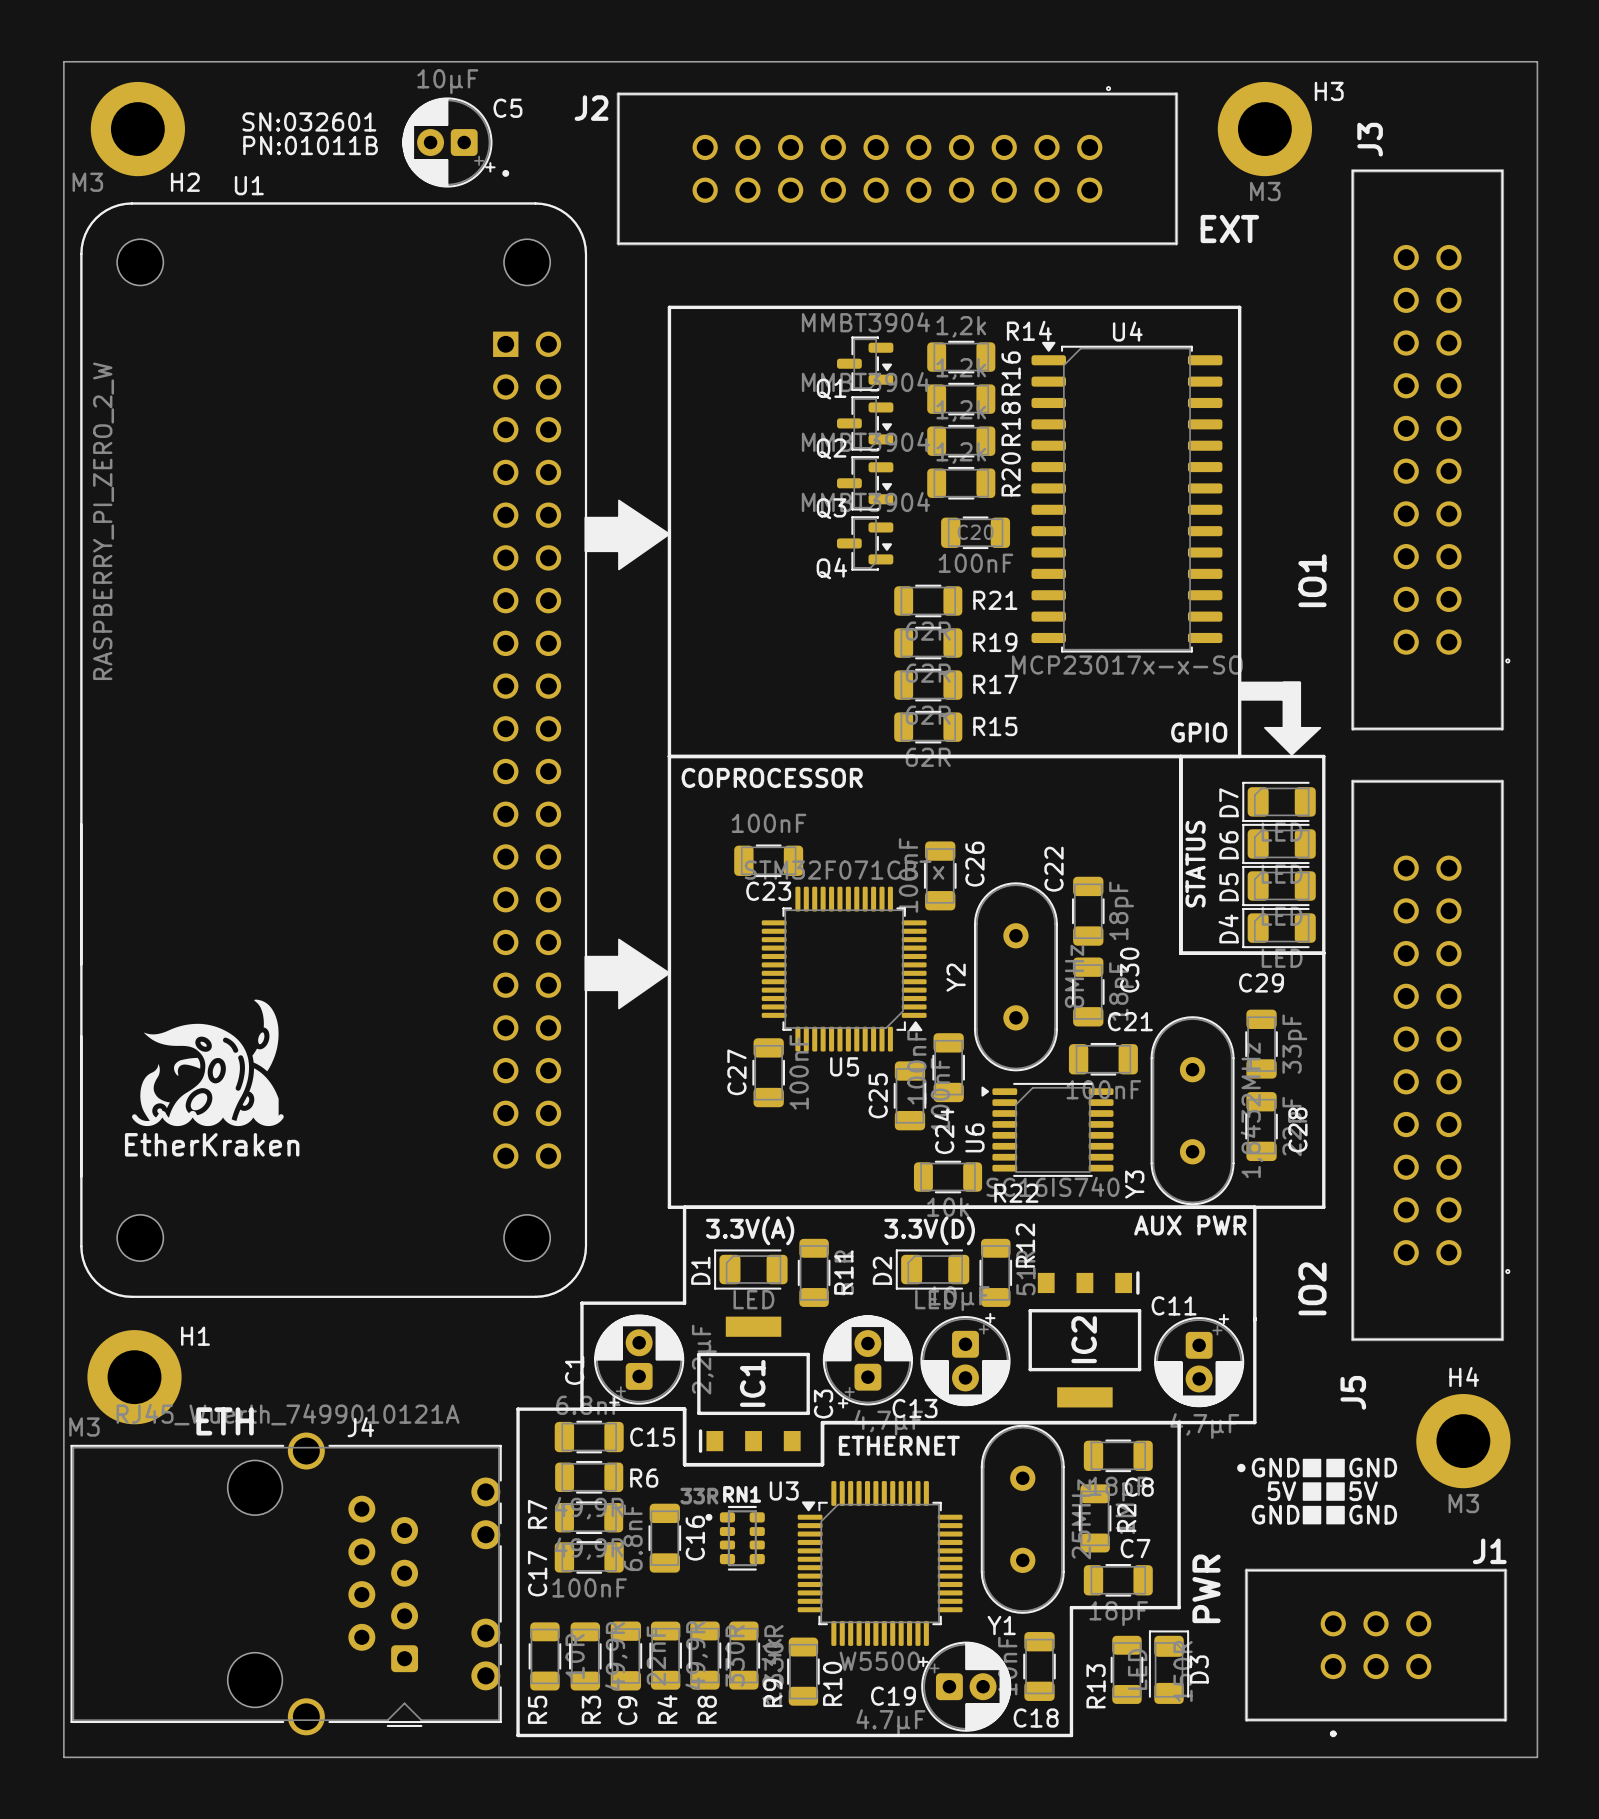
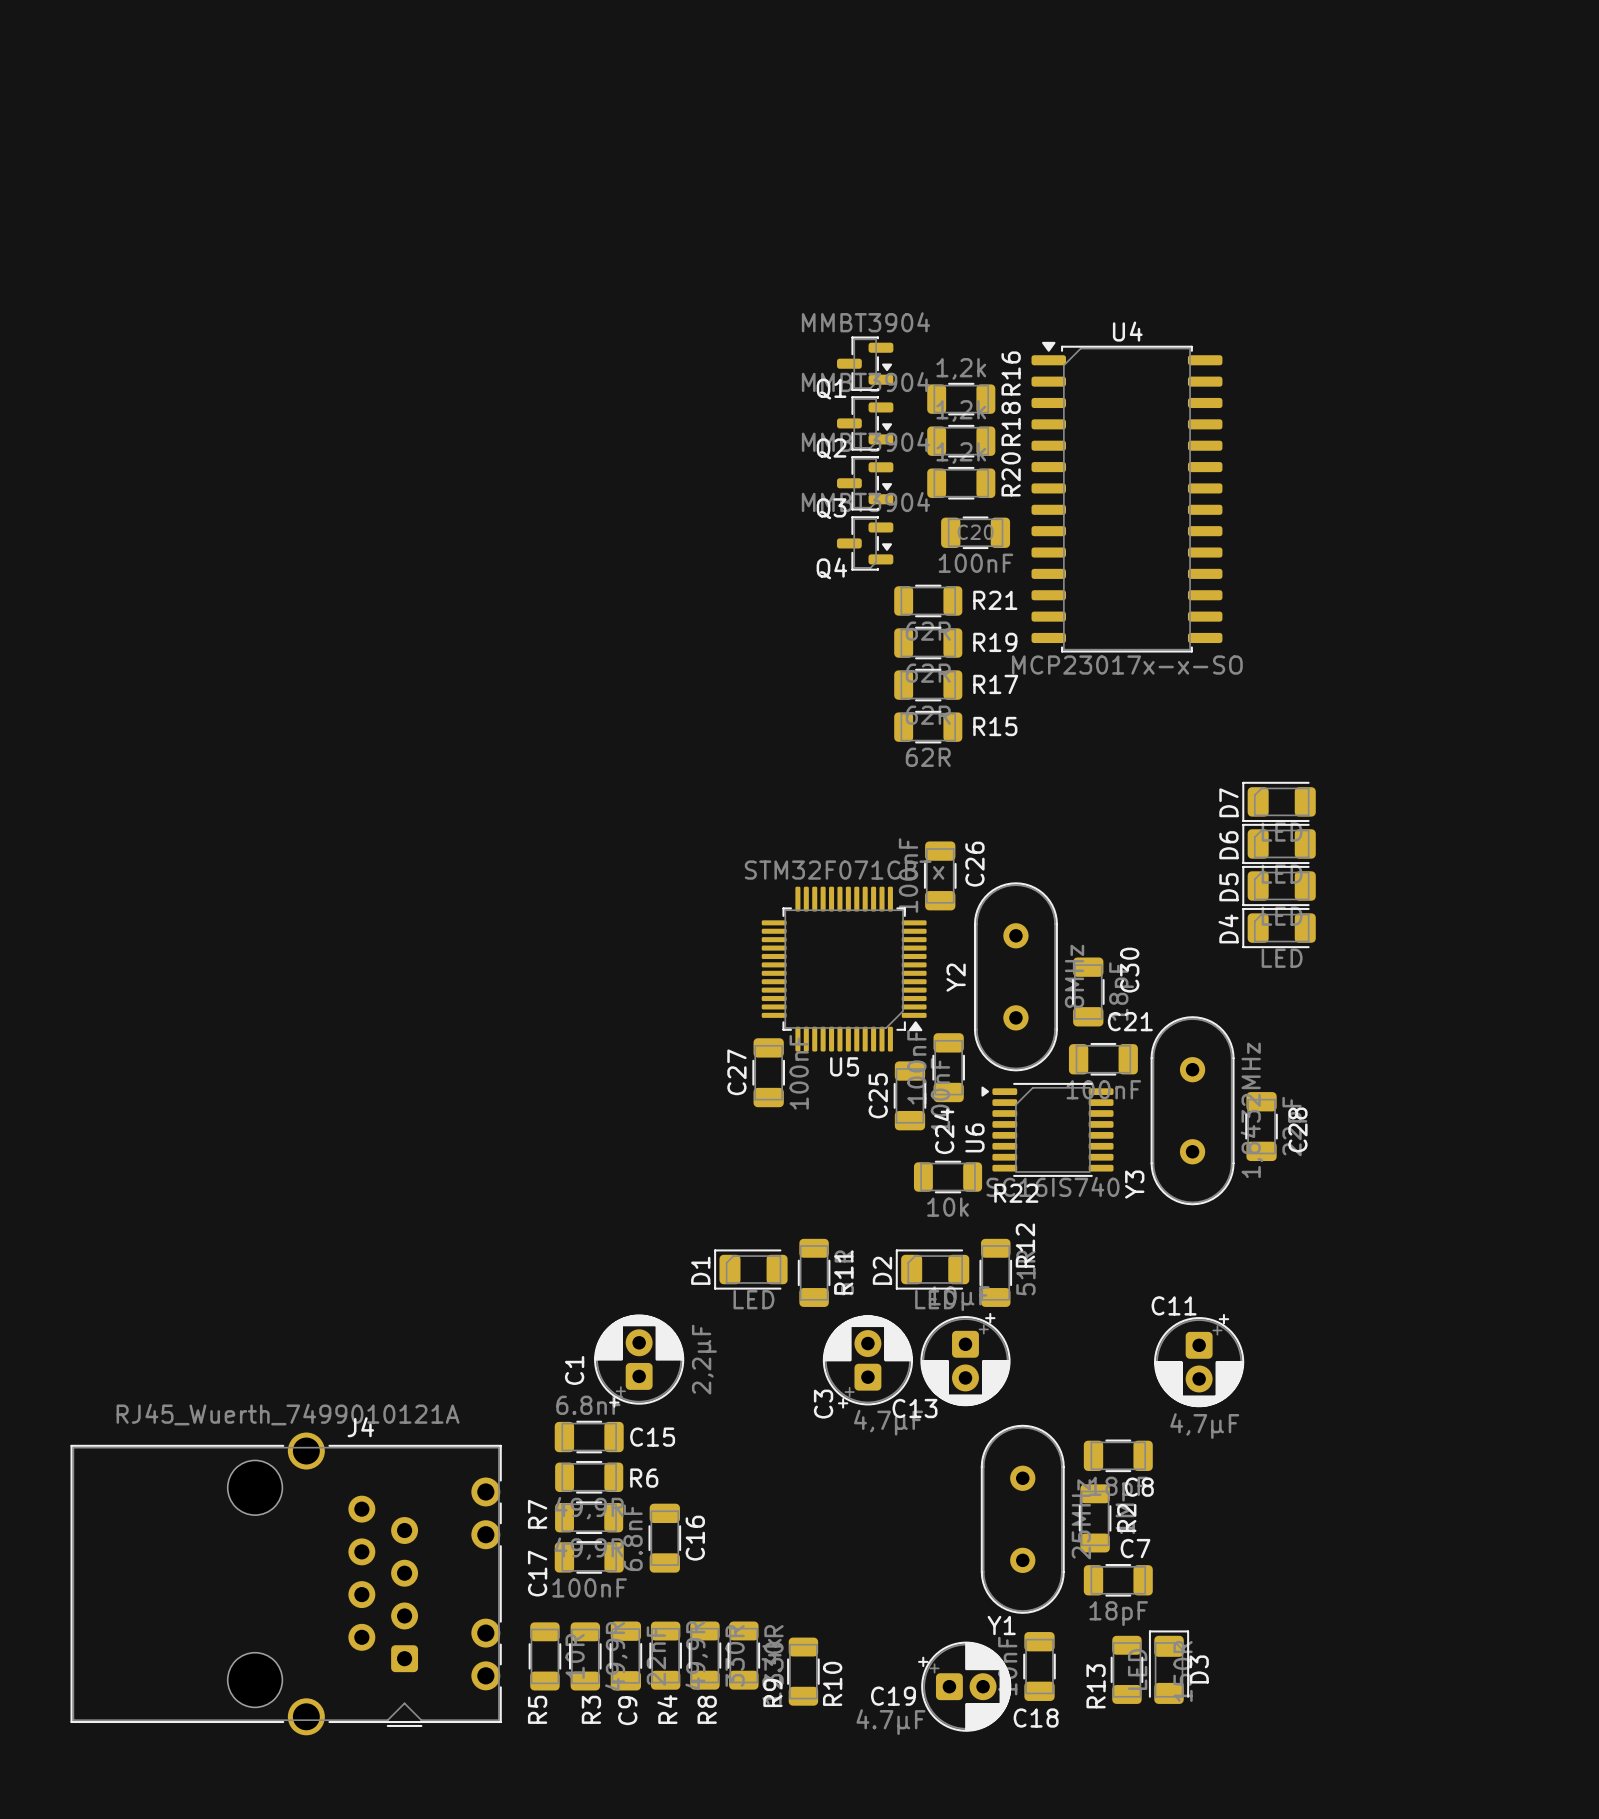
board edge: (63, 61) (1537, 61) (1537, 1757) (63, 1757) (63, 61) -> none
text: SN:032601 (309, 121) -> none
H2: M3 (137, 129) -> none
H3: M3 (1264, 129) -> none
C5: 10µF (448, 142) -> none
text: PN:01011B (310, 145) -> none
J2: (897, 165) -> none
text: EXT (1229, 229) -> none
R14: 1,2k (961, 357) -> none
J3: (1430, 449) -> none
drawing: [584, 499, 671, 571] -> none
text: IO1 (1312, 580) -> none
drawing: [1240, 681, 1322, 756] -> none
text: GPIO (1199, 732) -> none
U1: RASPBERRY_PI_ZERO_2_W (333, 733) -> none
line: (669, 756) (1323, 756) (1323, 1207) (669, 1207) (669, 307) (1239, 307) (1239, 756) -> none
line: (1180, 756) (1180, 953) (1323, 953) -> none
text: COPROCESSOR (772, 777) -> none
C23: 100nF (768, 860) -> none
text: STATUS (1195, 864) -> none
C22: 18pF (1088, 911) -> none
drawing: [584, 938, 671, 1010] -> none
drawing: [132, 999, 284, 1127] -> none
C29: 33pF (1261, 1044) -> none
J5: (1430, 1060) -> none
text: EtherKraken (212, 1144) -> none
line: (684, 1207) (684, 1303) (581, 1303) (581, 1409) -> none
line: (1254, 1207) (1254, 1422) (822, 1422) (822, 1464) (684, 1464) (684, 1409) (518, 1409) (518, 1735) (1071, 1735) (1071, 1607) (1179, 1607) (1179, 1422) -> none
text: AUX PWR (1190, 1225) -> none
text: 3.3V(A) (750, 1230) -> none
text: 3.3V(D) (929, 1230) -> none
text: IO2 (1312, 1288) -> none
IC2: (1084, 1339) -> none
H1: M3 (134, 1377) -> none
IC1: (753, 1384) -> none
text: ETH (225, 1421) -> none
H4: M3 (1463, 1441) -> none
text: ETHERNET (899, 1445) -> none
drawing: [1302, 1458, 1345, 1525] -> none
drawing: [1237, 1463, 1246, 1473] -> none
text: GND (1275, 1467) -> none
text: GND (1373, 1467) -> none
text: 5V (1281, 1491) -> none
text: 5V (1363, 1491) -> none
text: GND (1275, 1514) -> none
text: GND (1373, 1514) -> none
RN1: 33R (735, 1538) -> none
U3: W5500 (880, 1563) -> none
text: PWR (1206, 1588) -> none
J1: (1376, 1652) -> none

